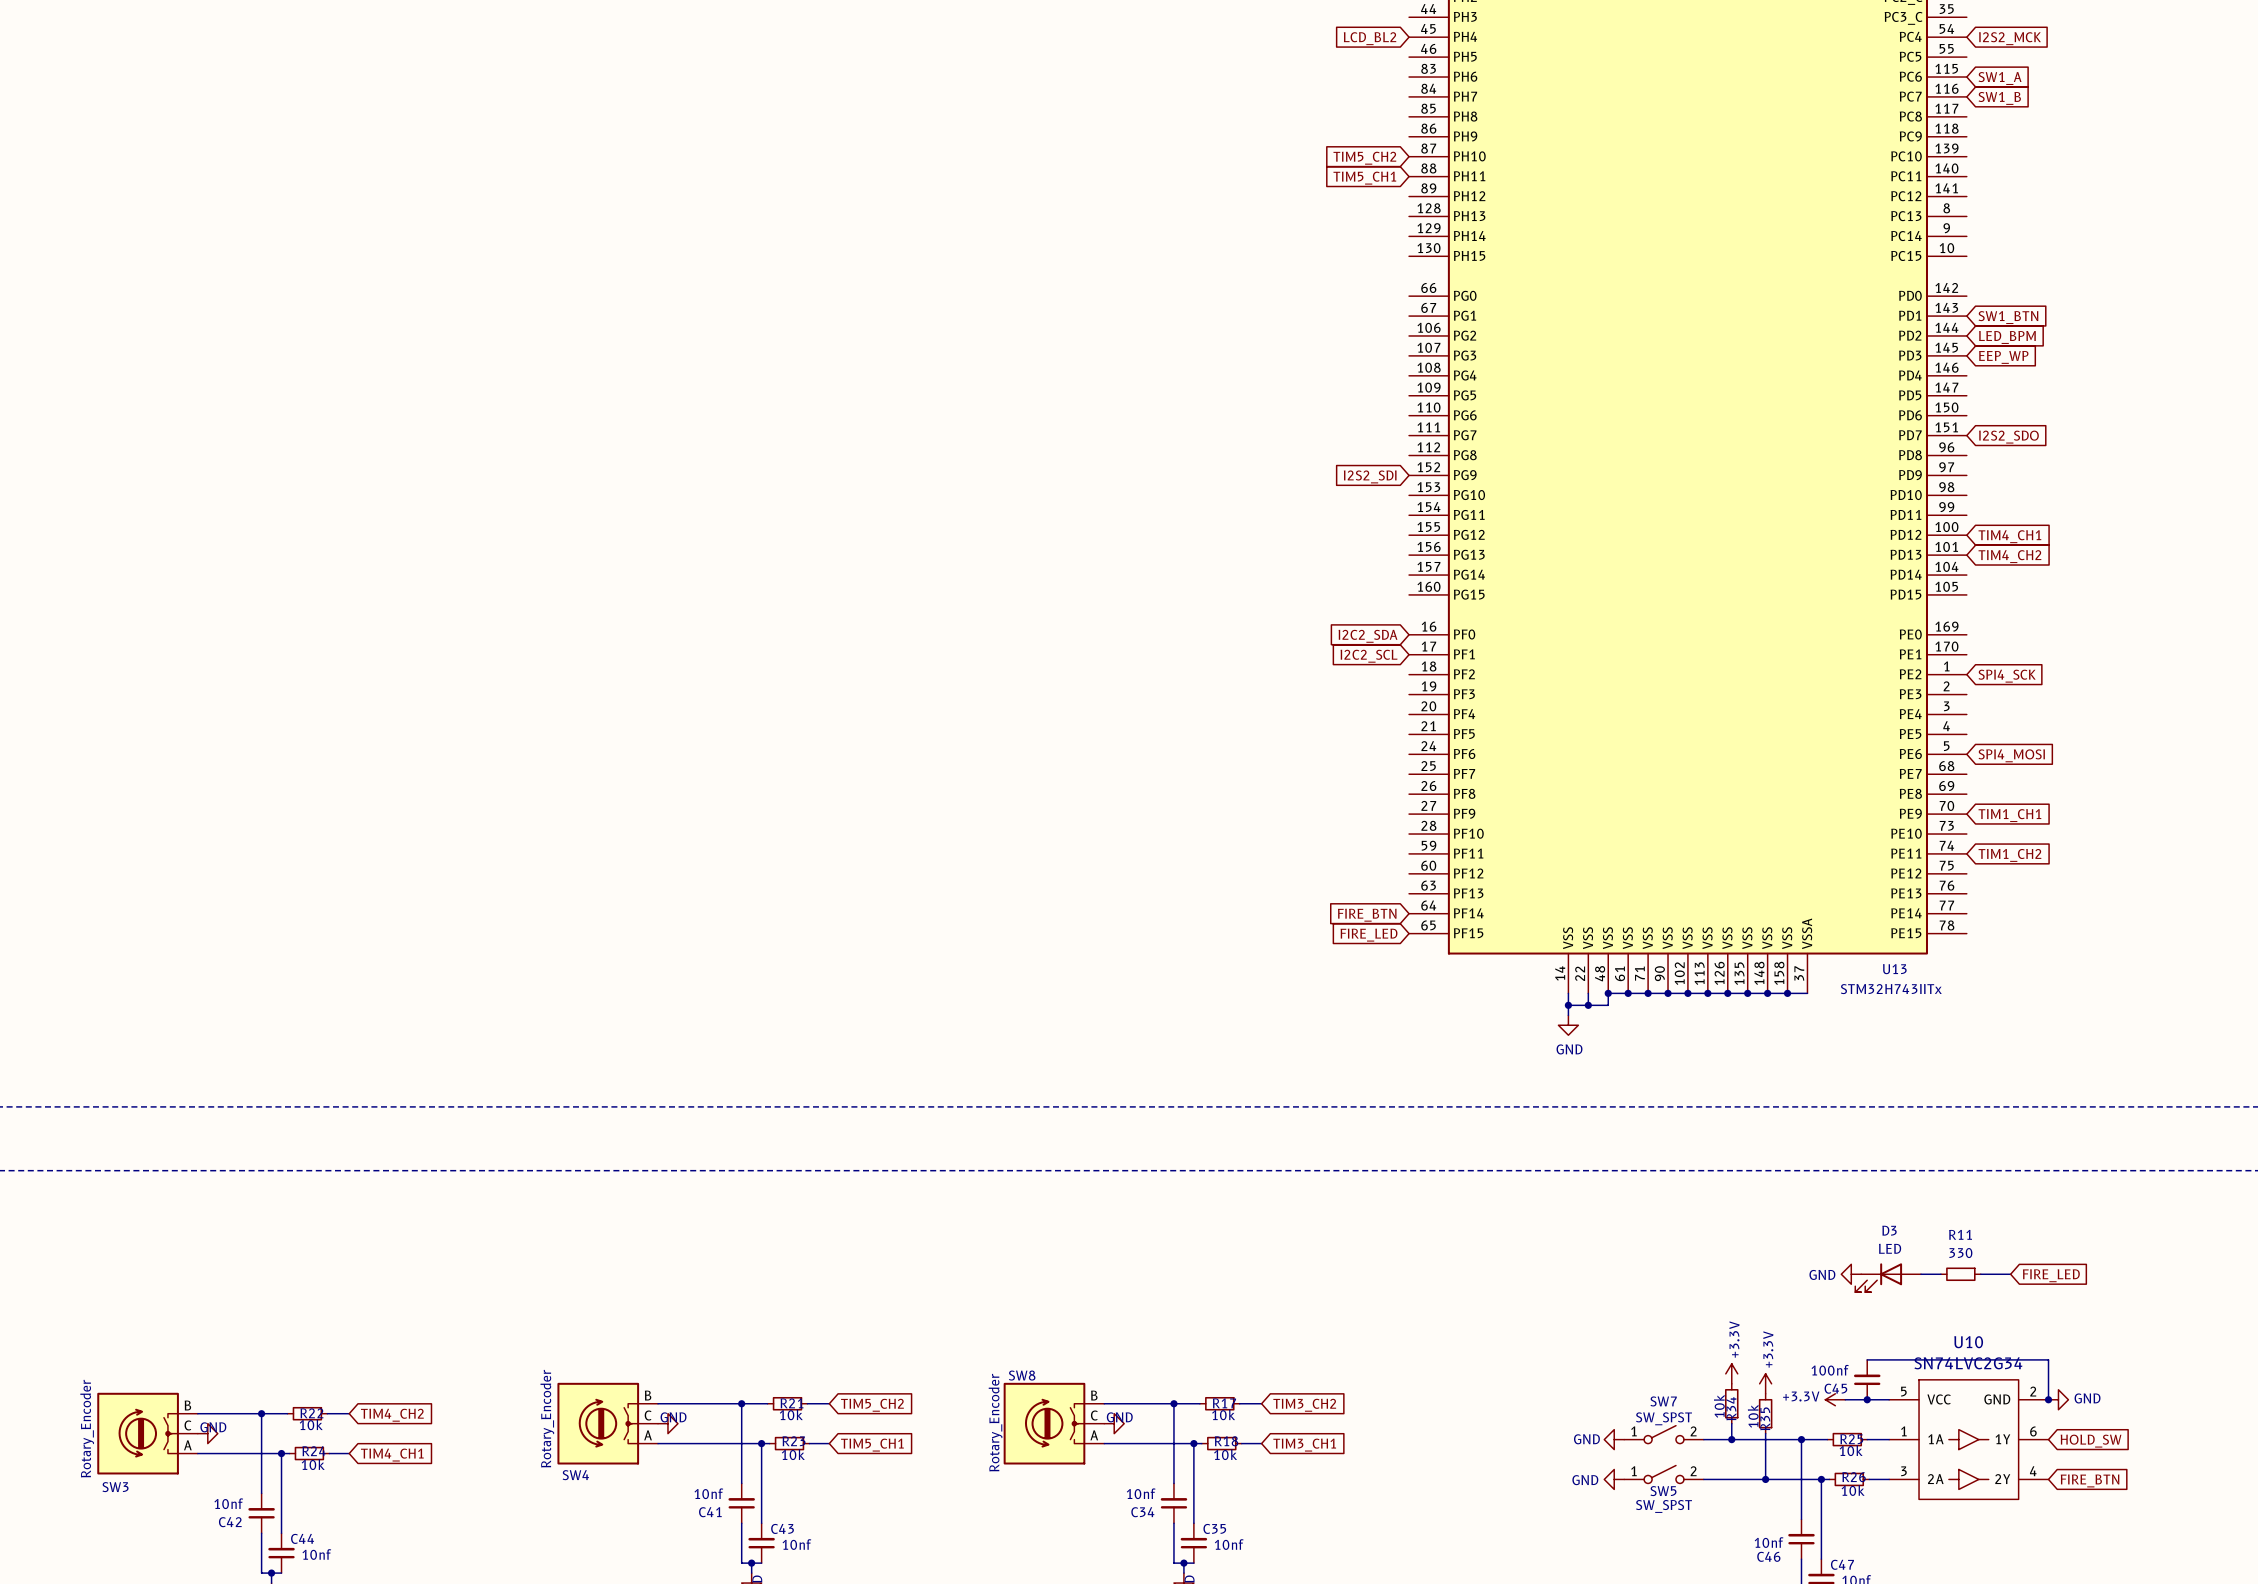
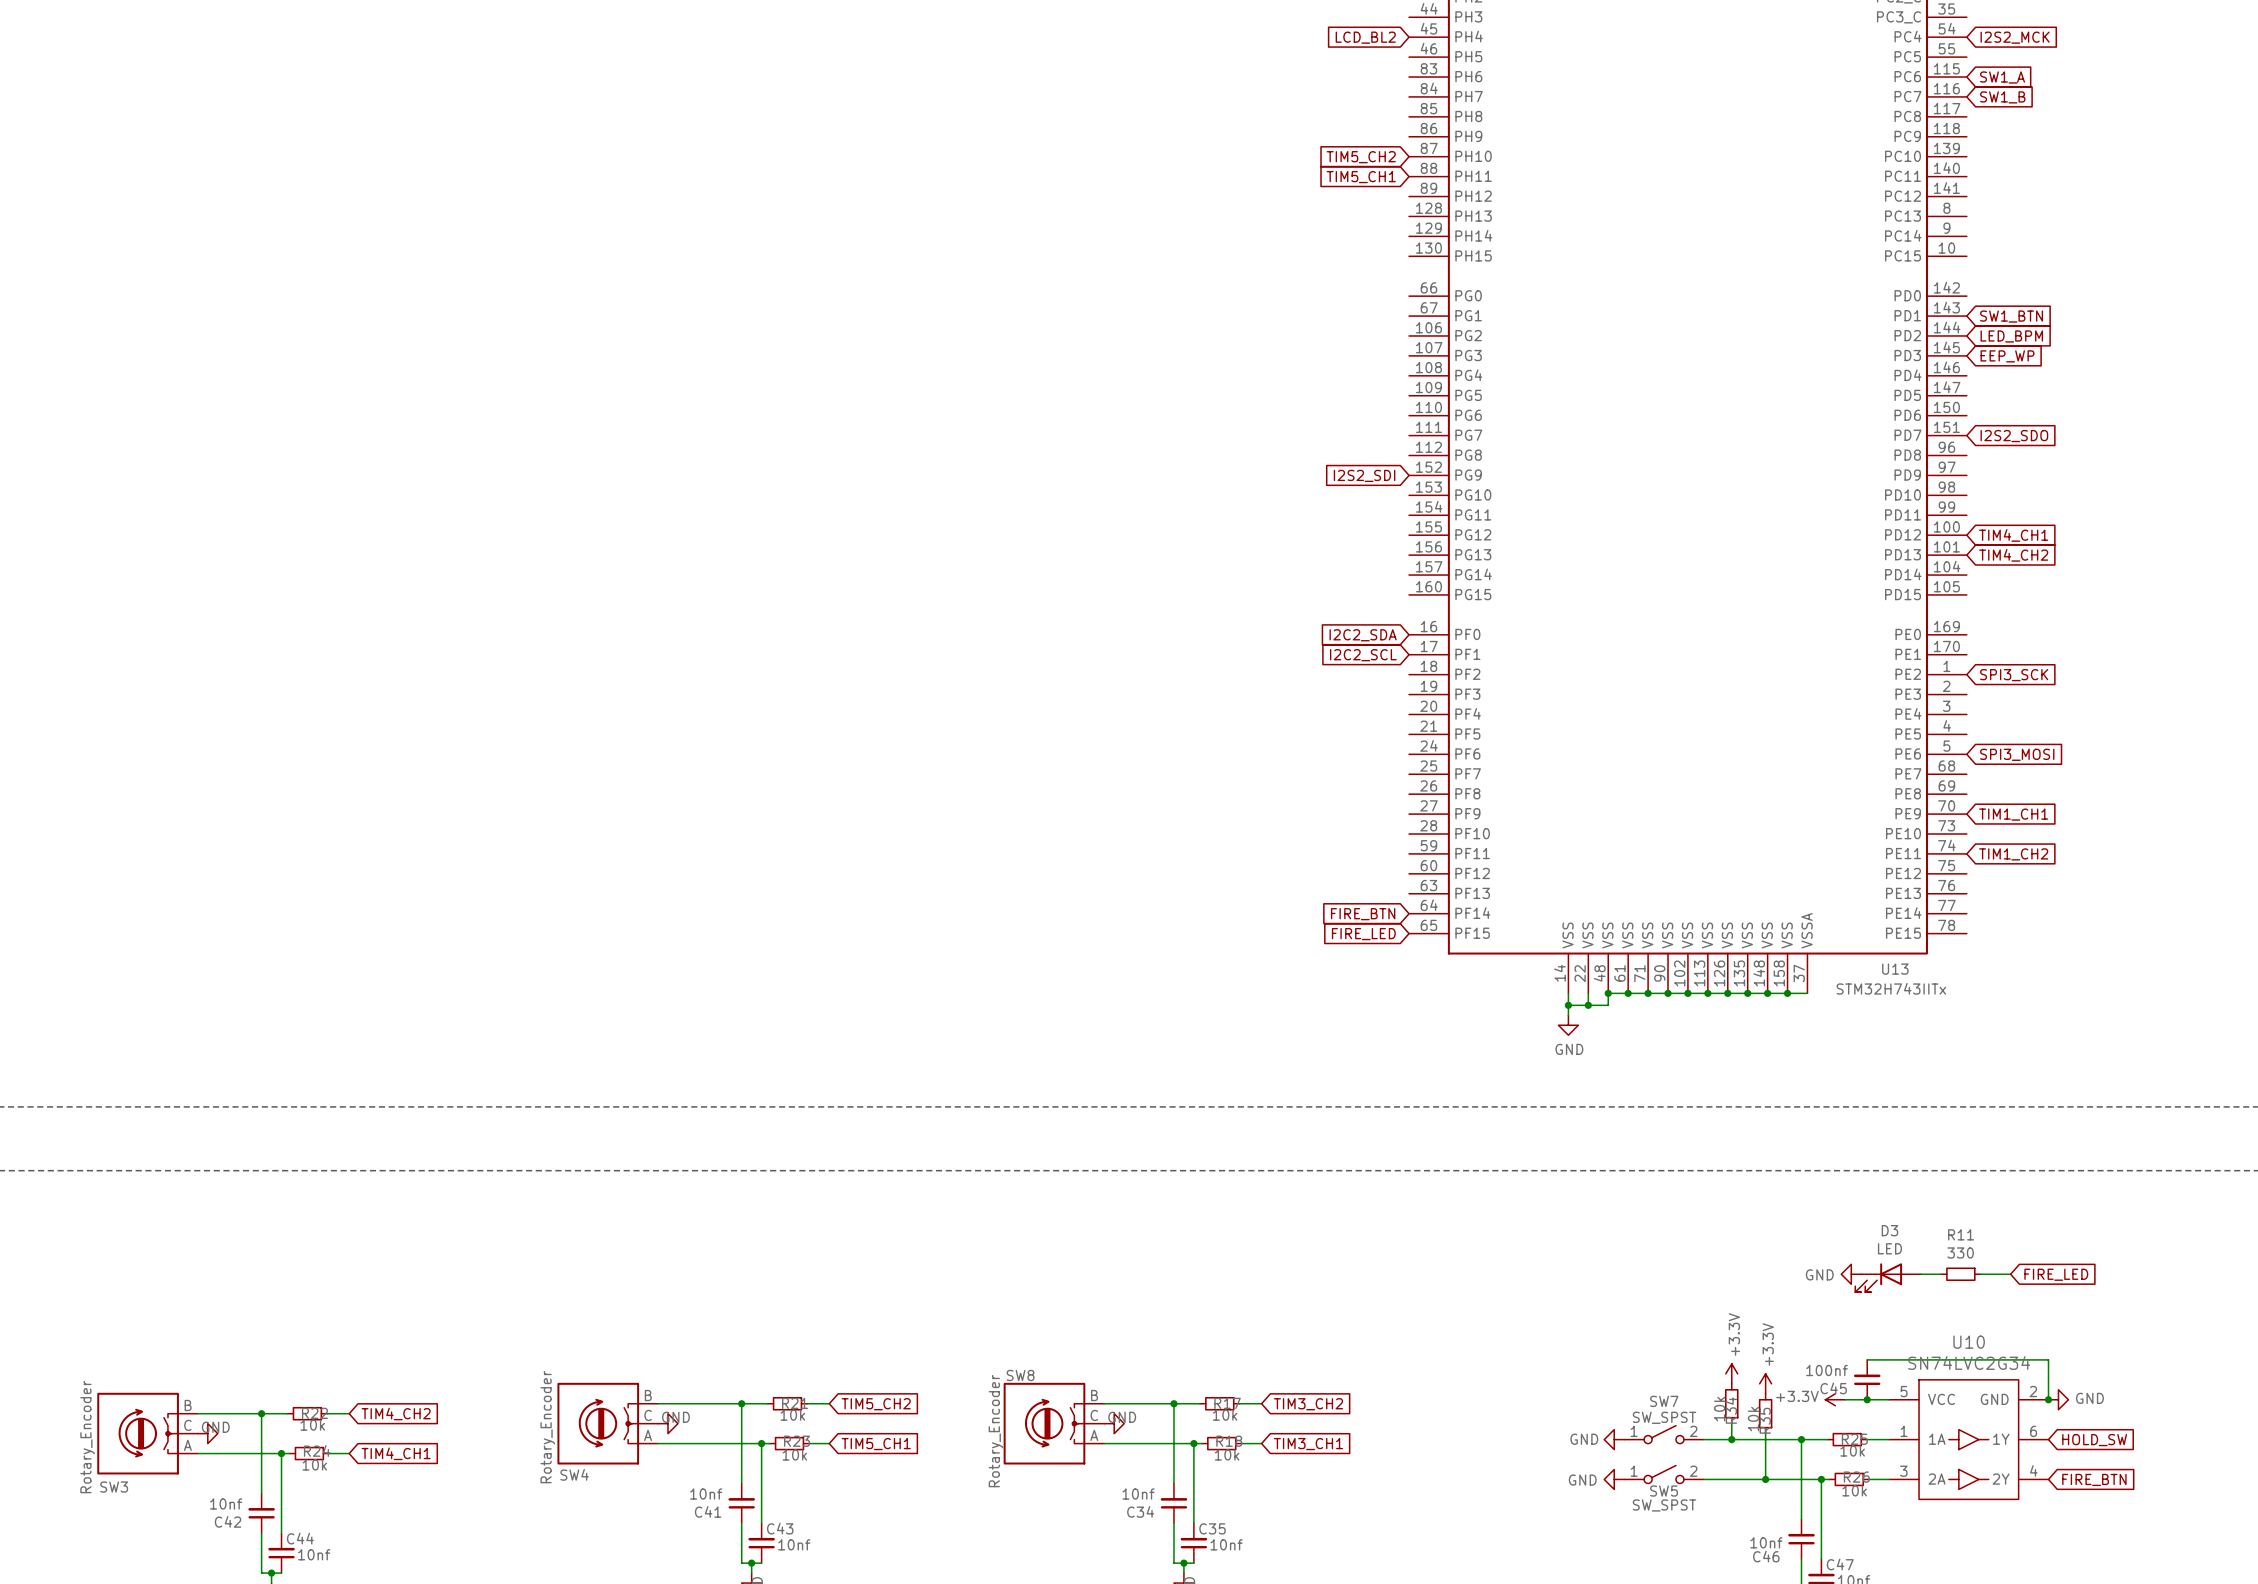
global label: SPI4_SCK (2007, 676) -> SPI3_SCK (2014, 675)
global label: SPI4_MOSI (2011, 755) -> SPI3_MOSI (2017, 754)

